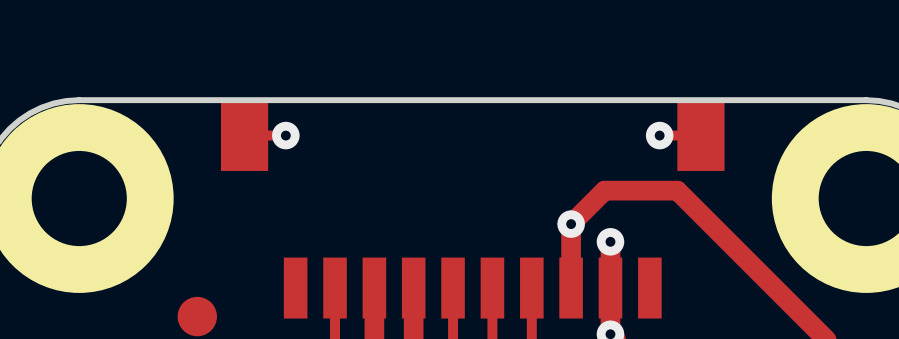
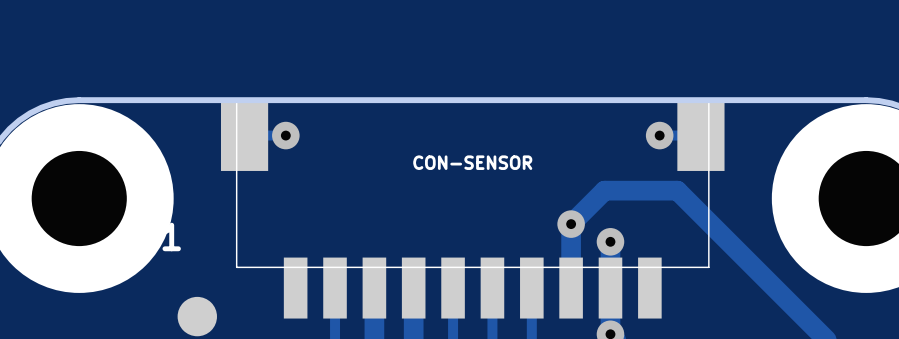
part: (472, 209) -> none
part: none -> CON-SENSOR (472, 209)

